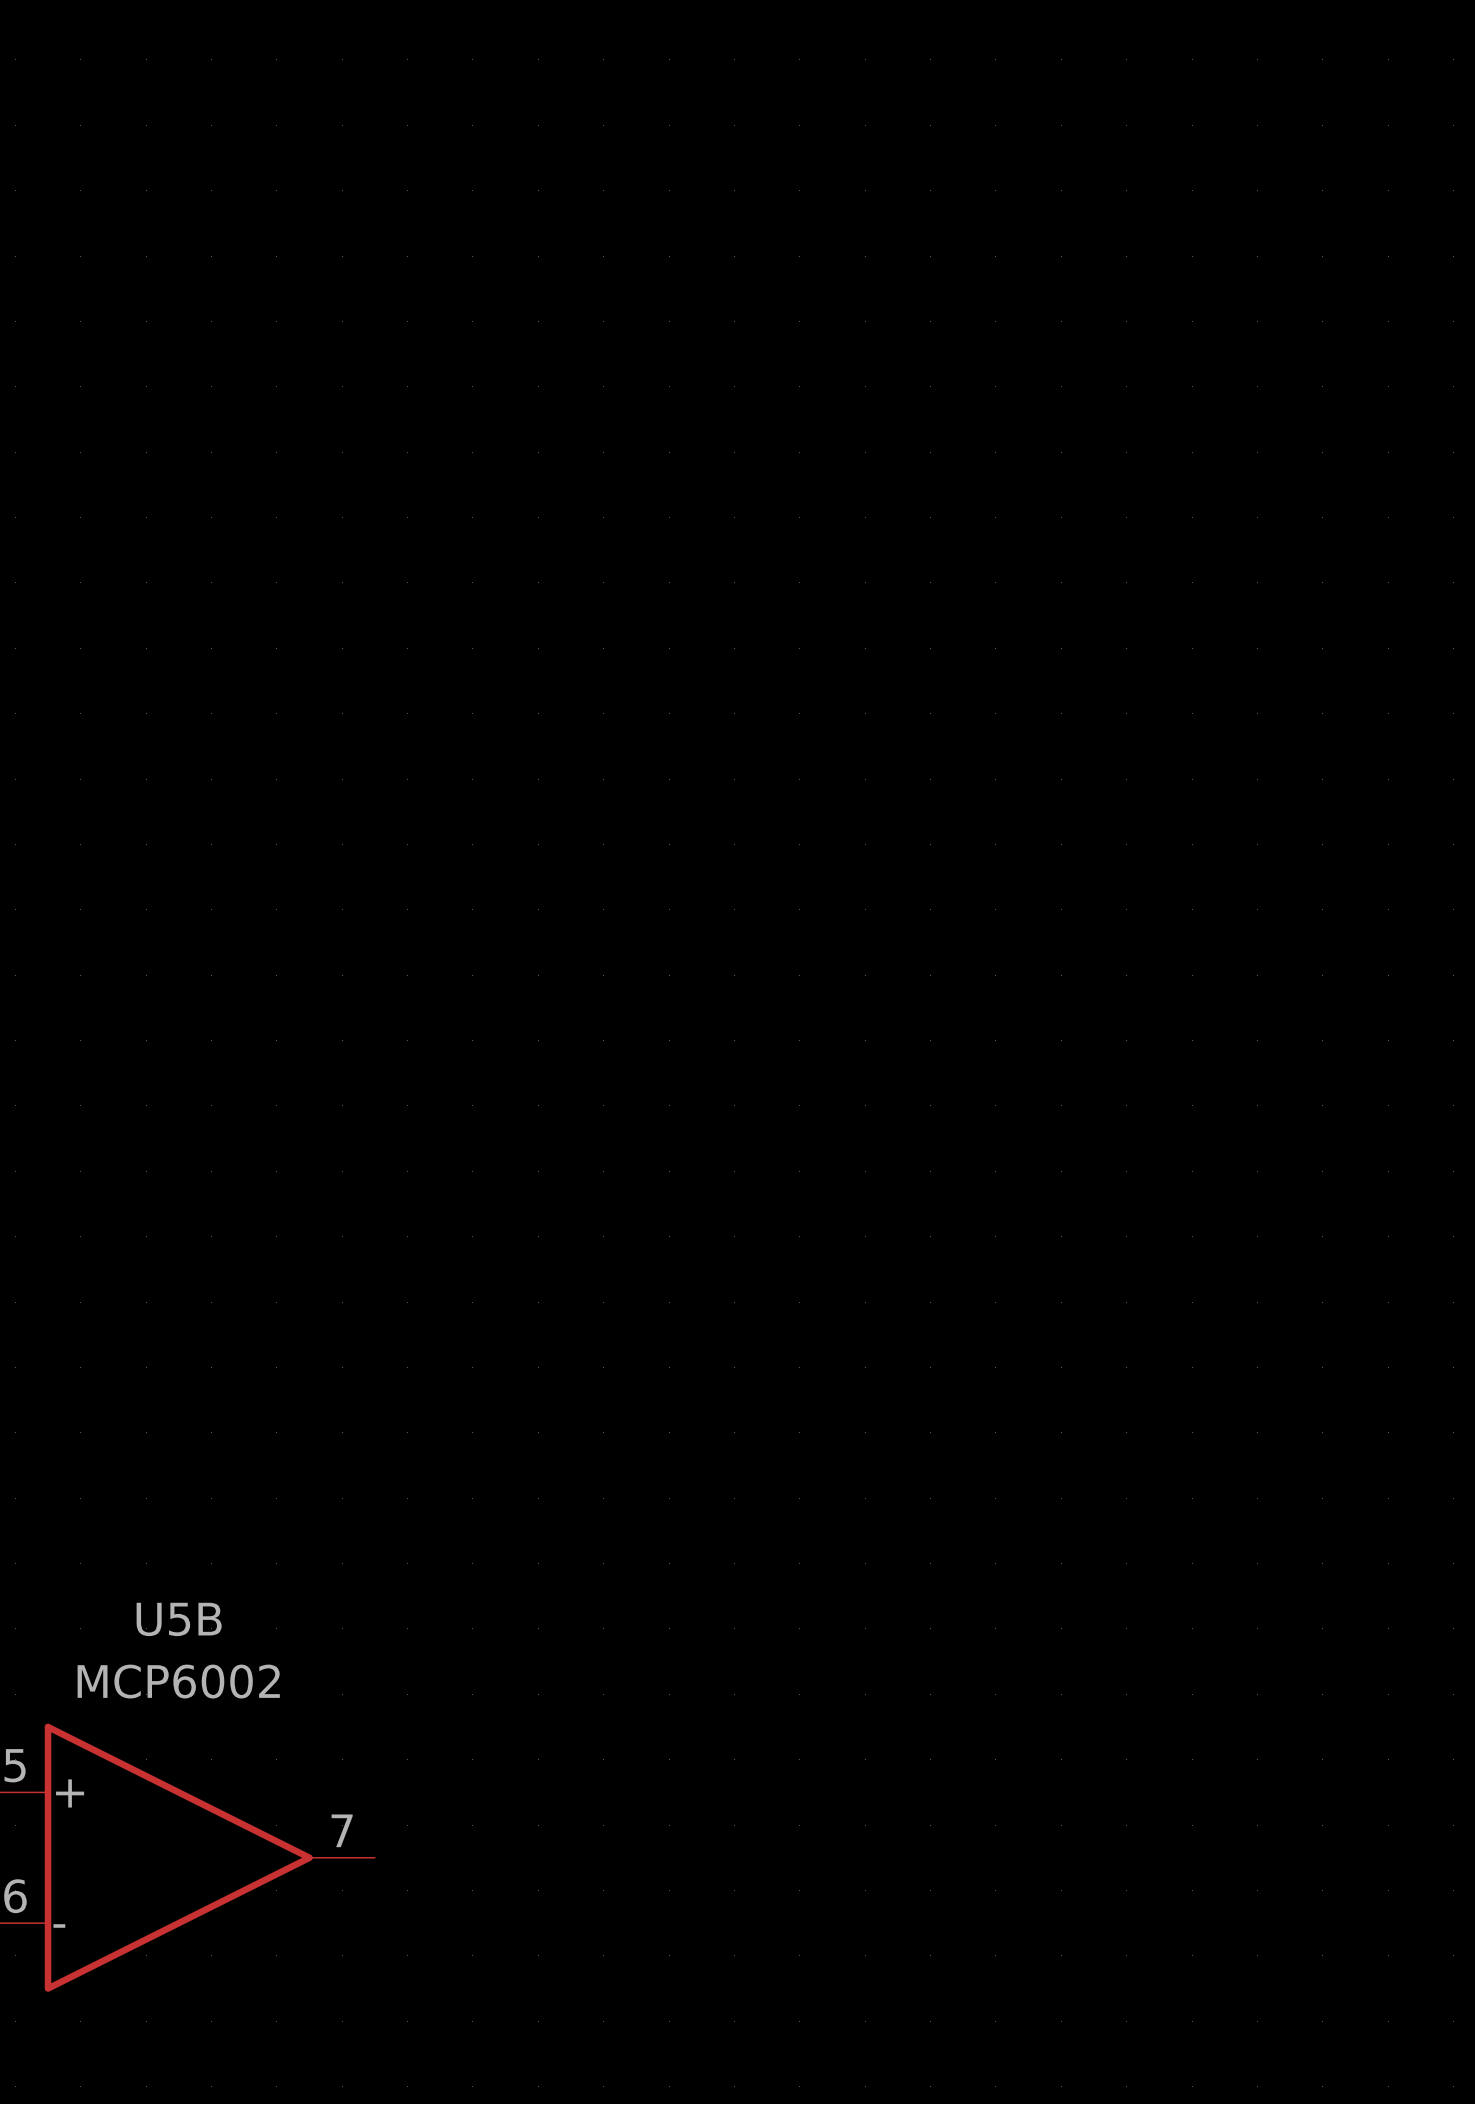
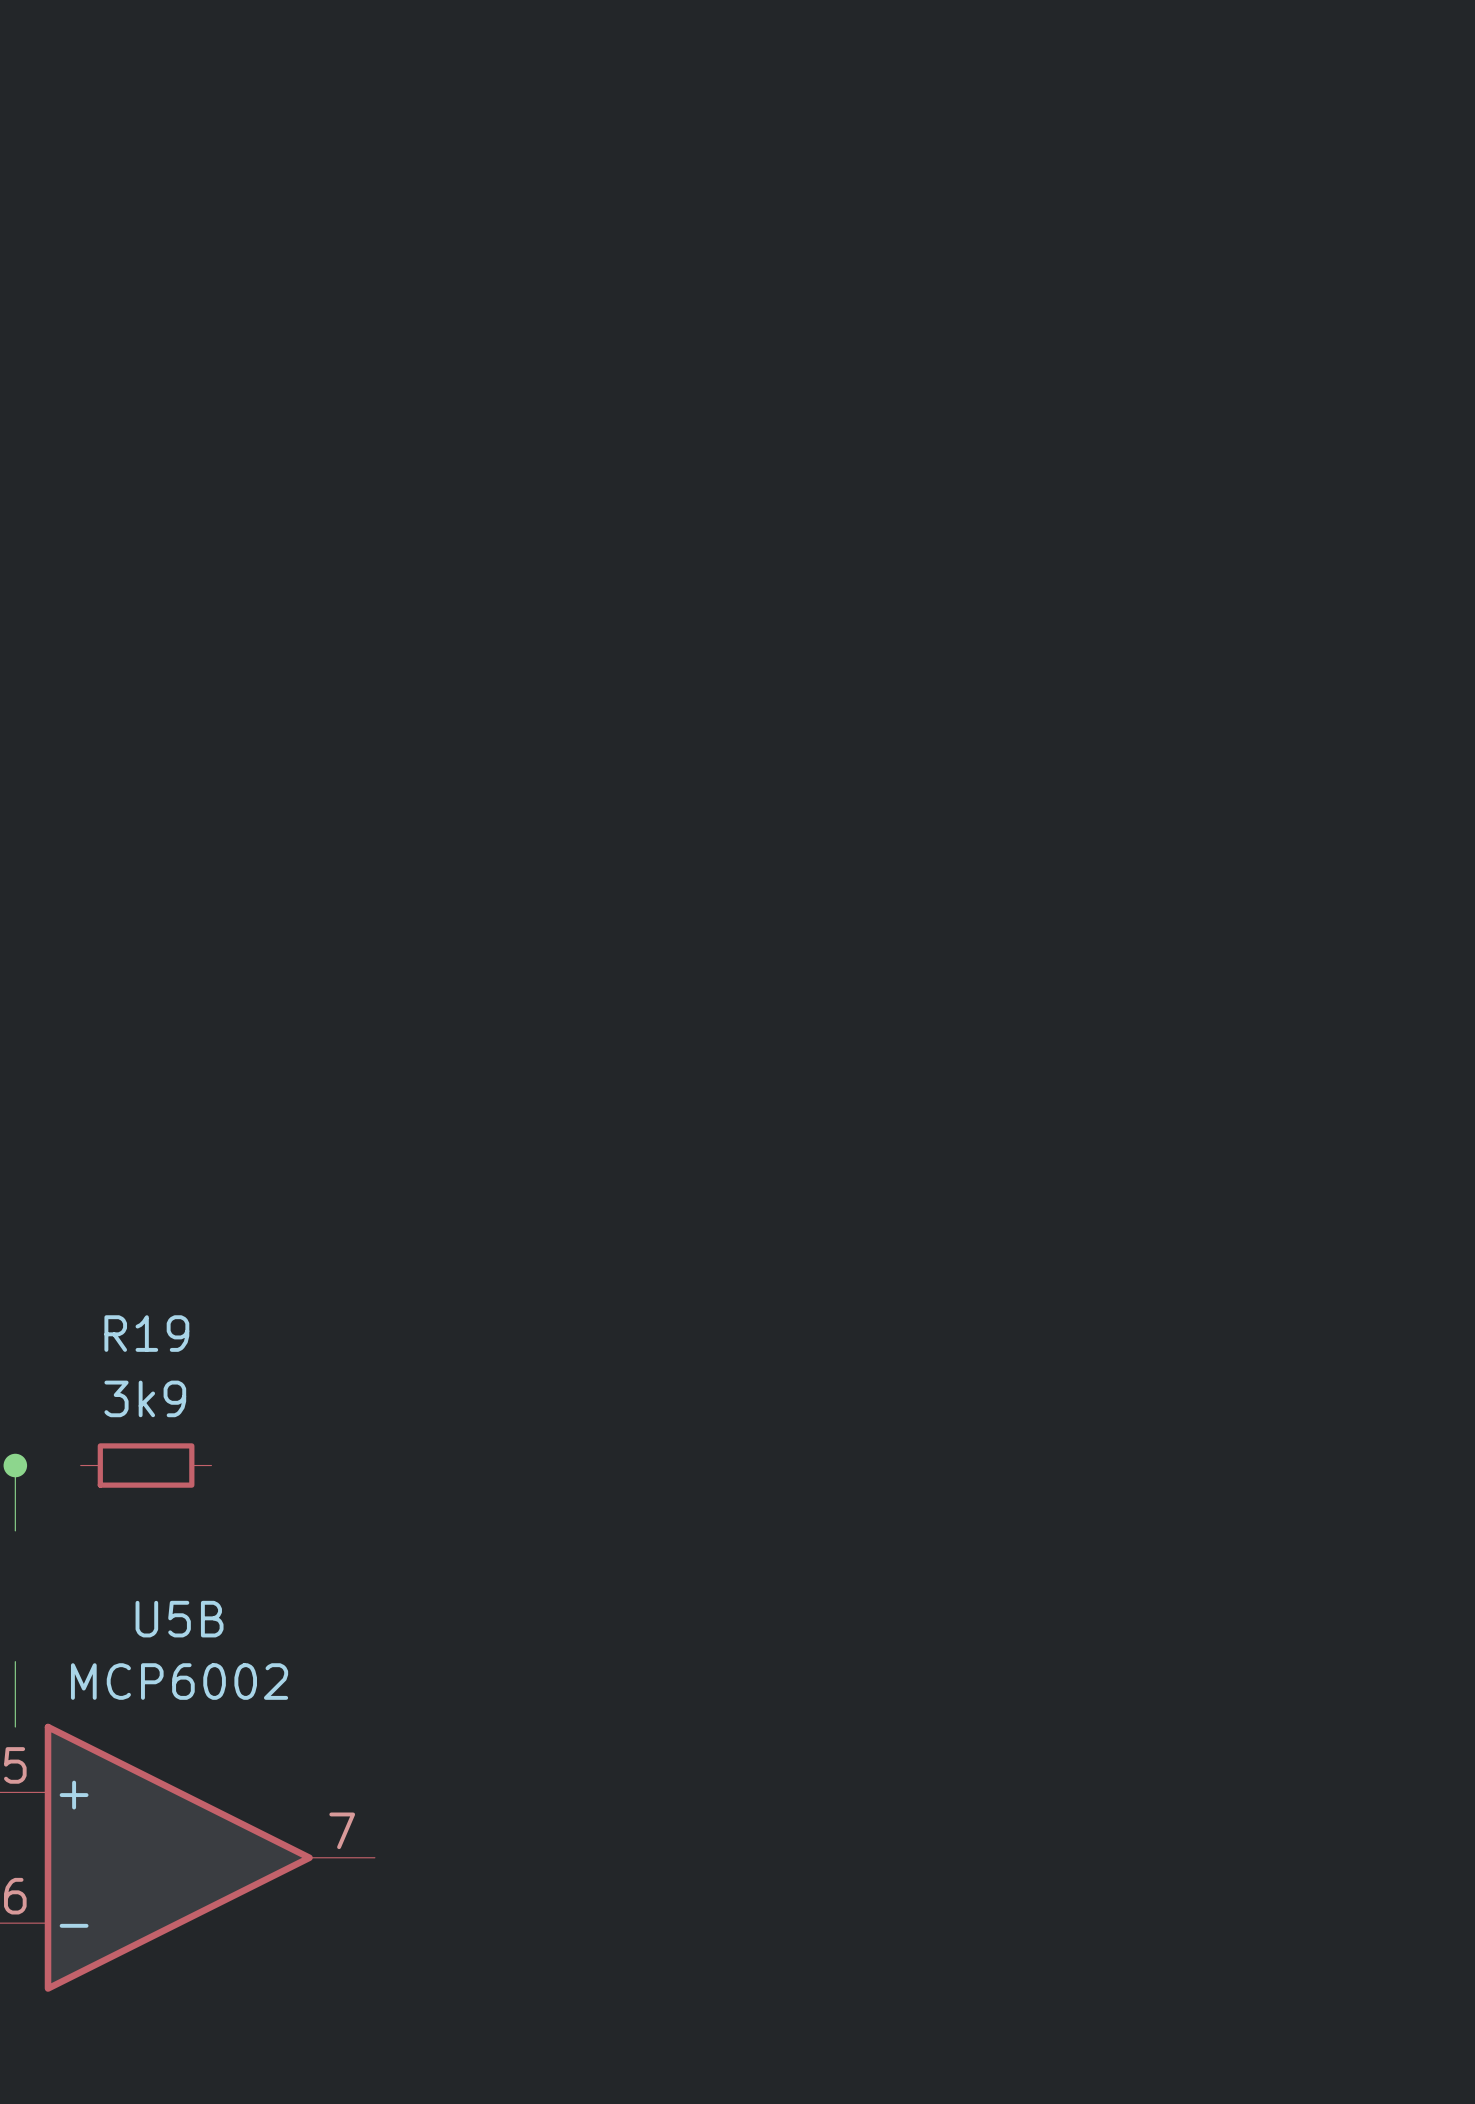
wire: none -> (15, 1465) (15, 1530)
junction: none -> (15, 1465)
R19: none -> 3k9 (146, 1465)
wire: none -> (15, 1661) (15, 1727)

